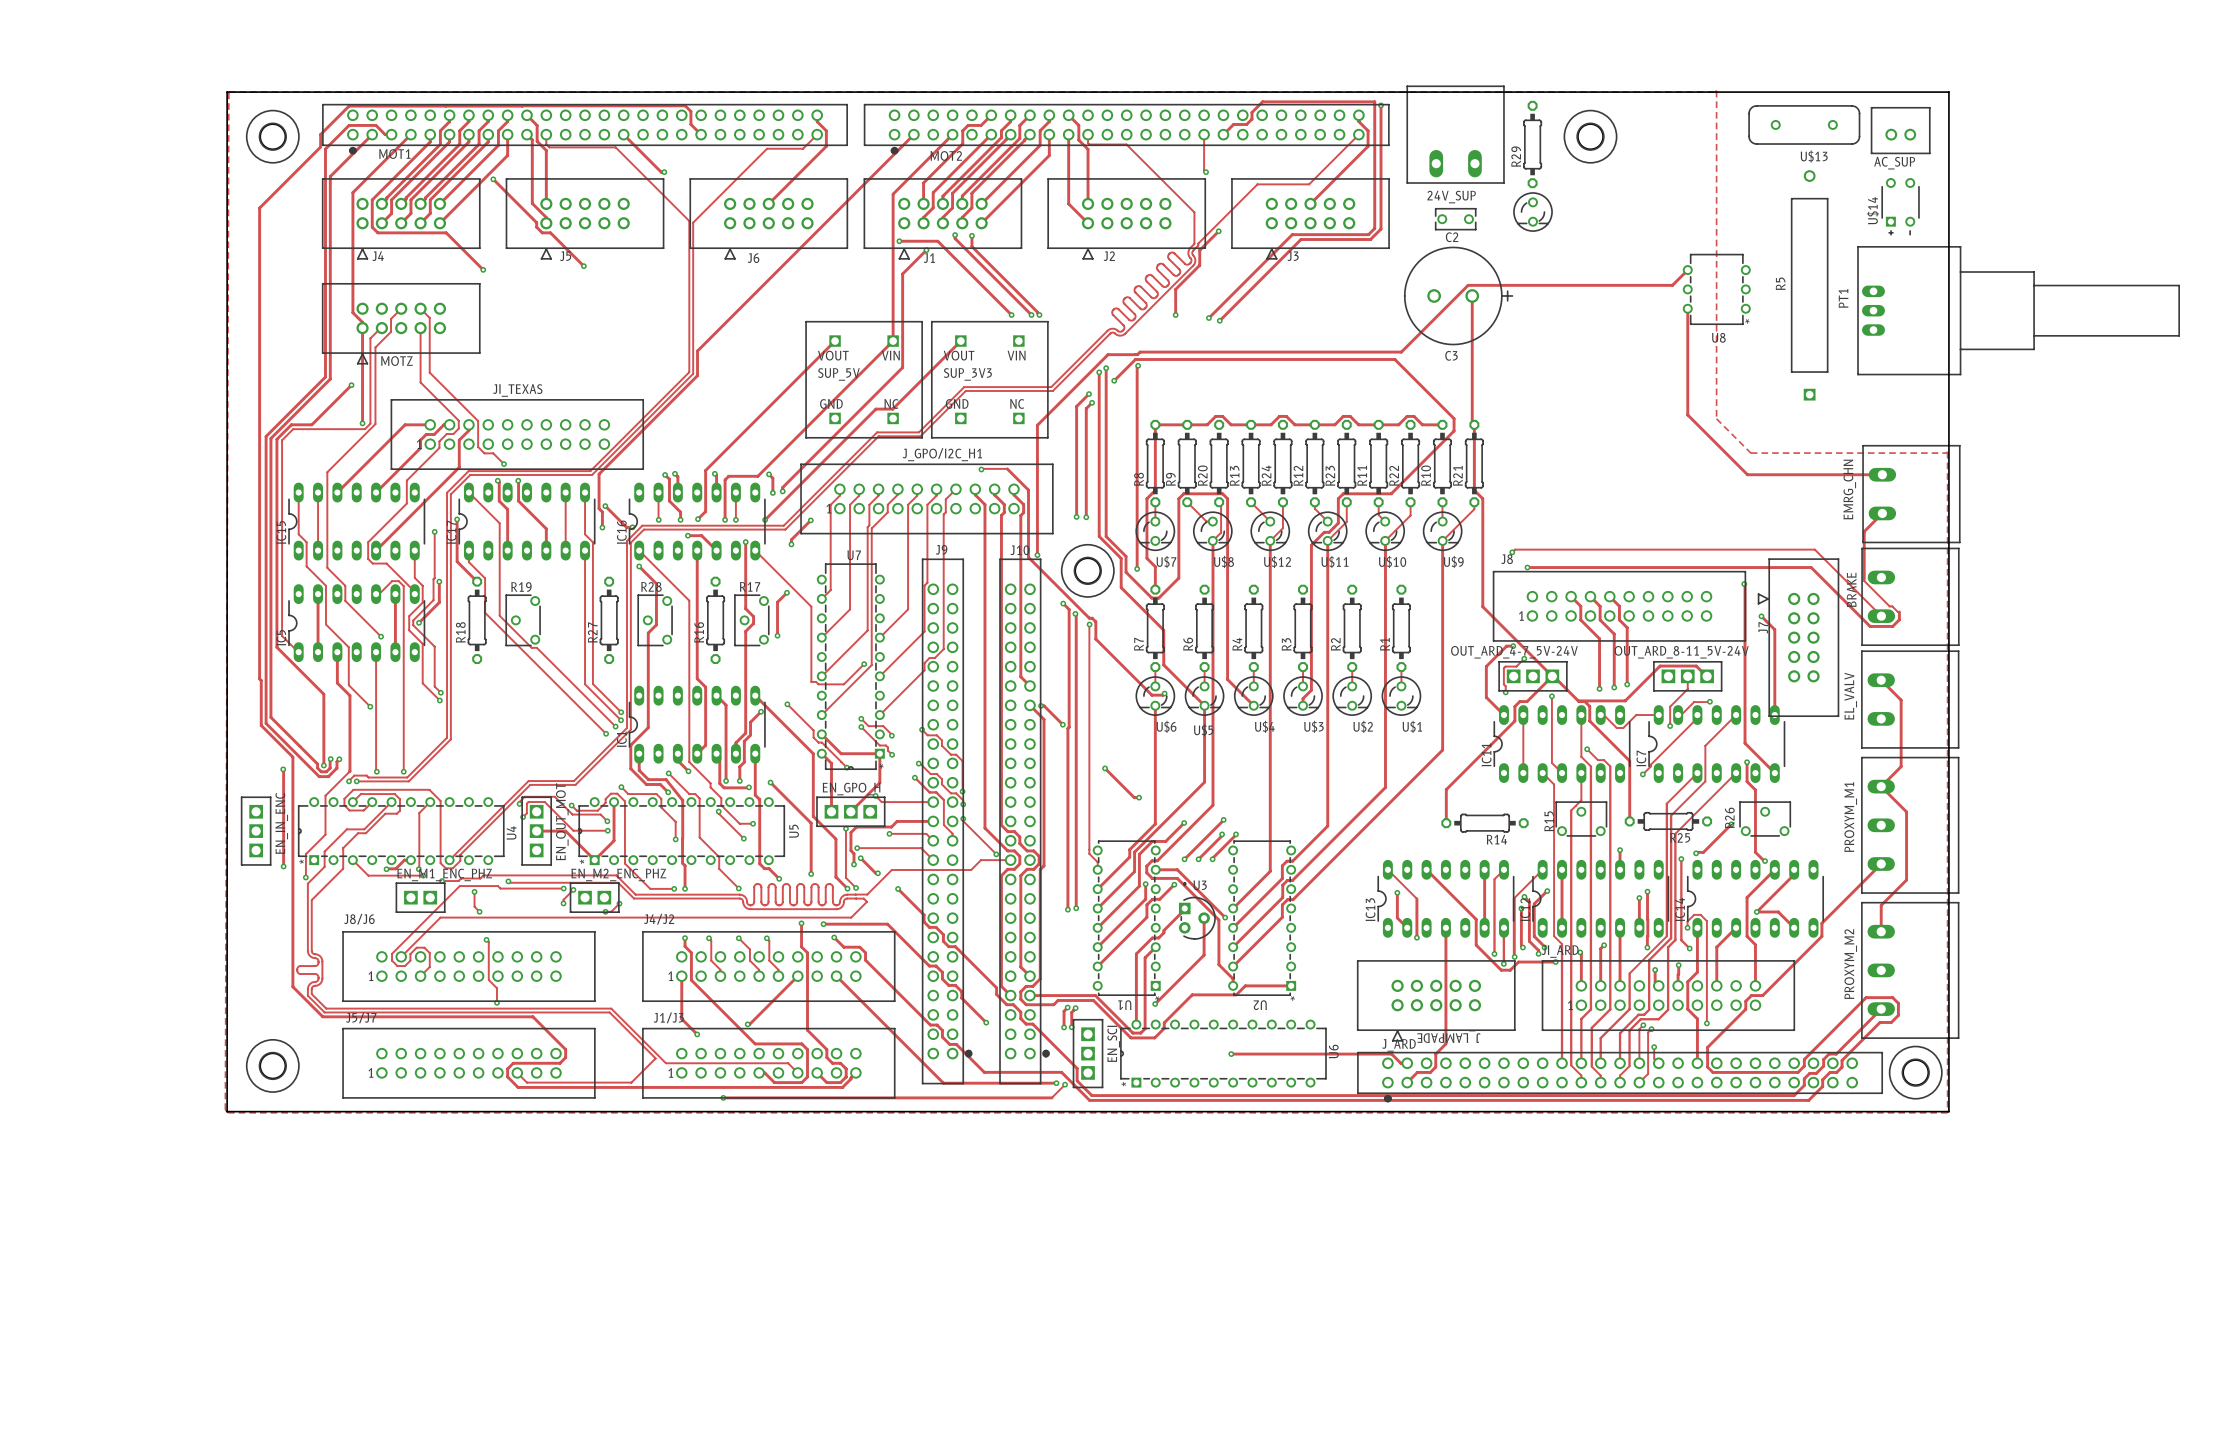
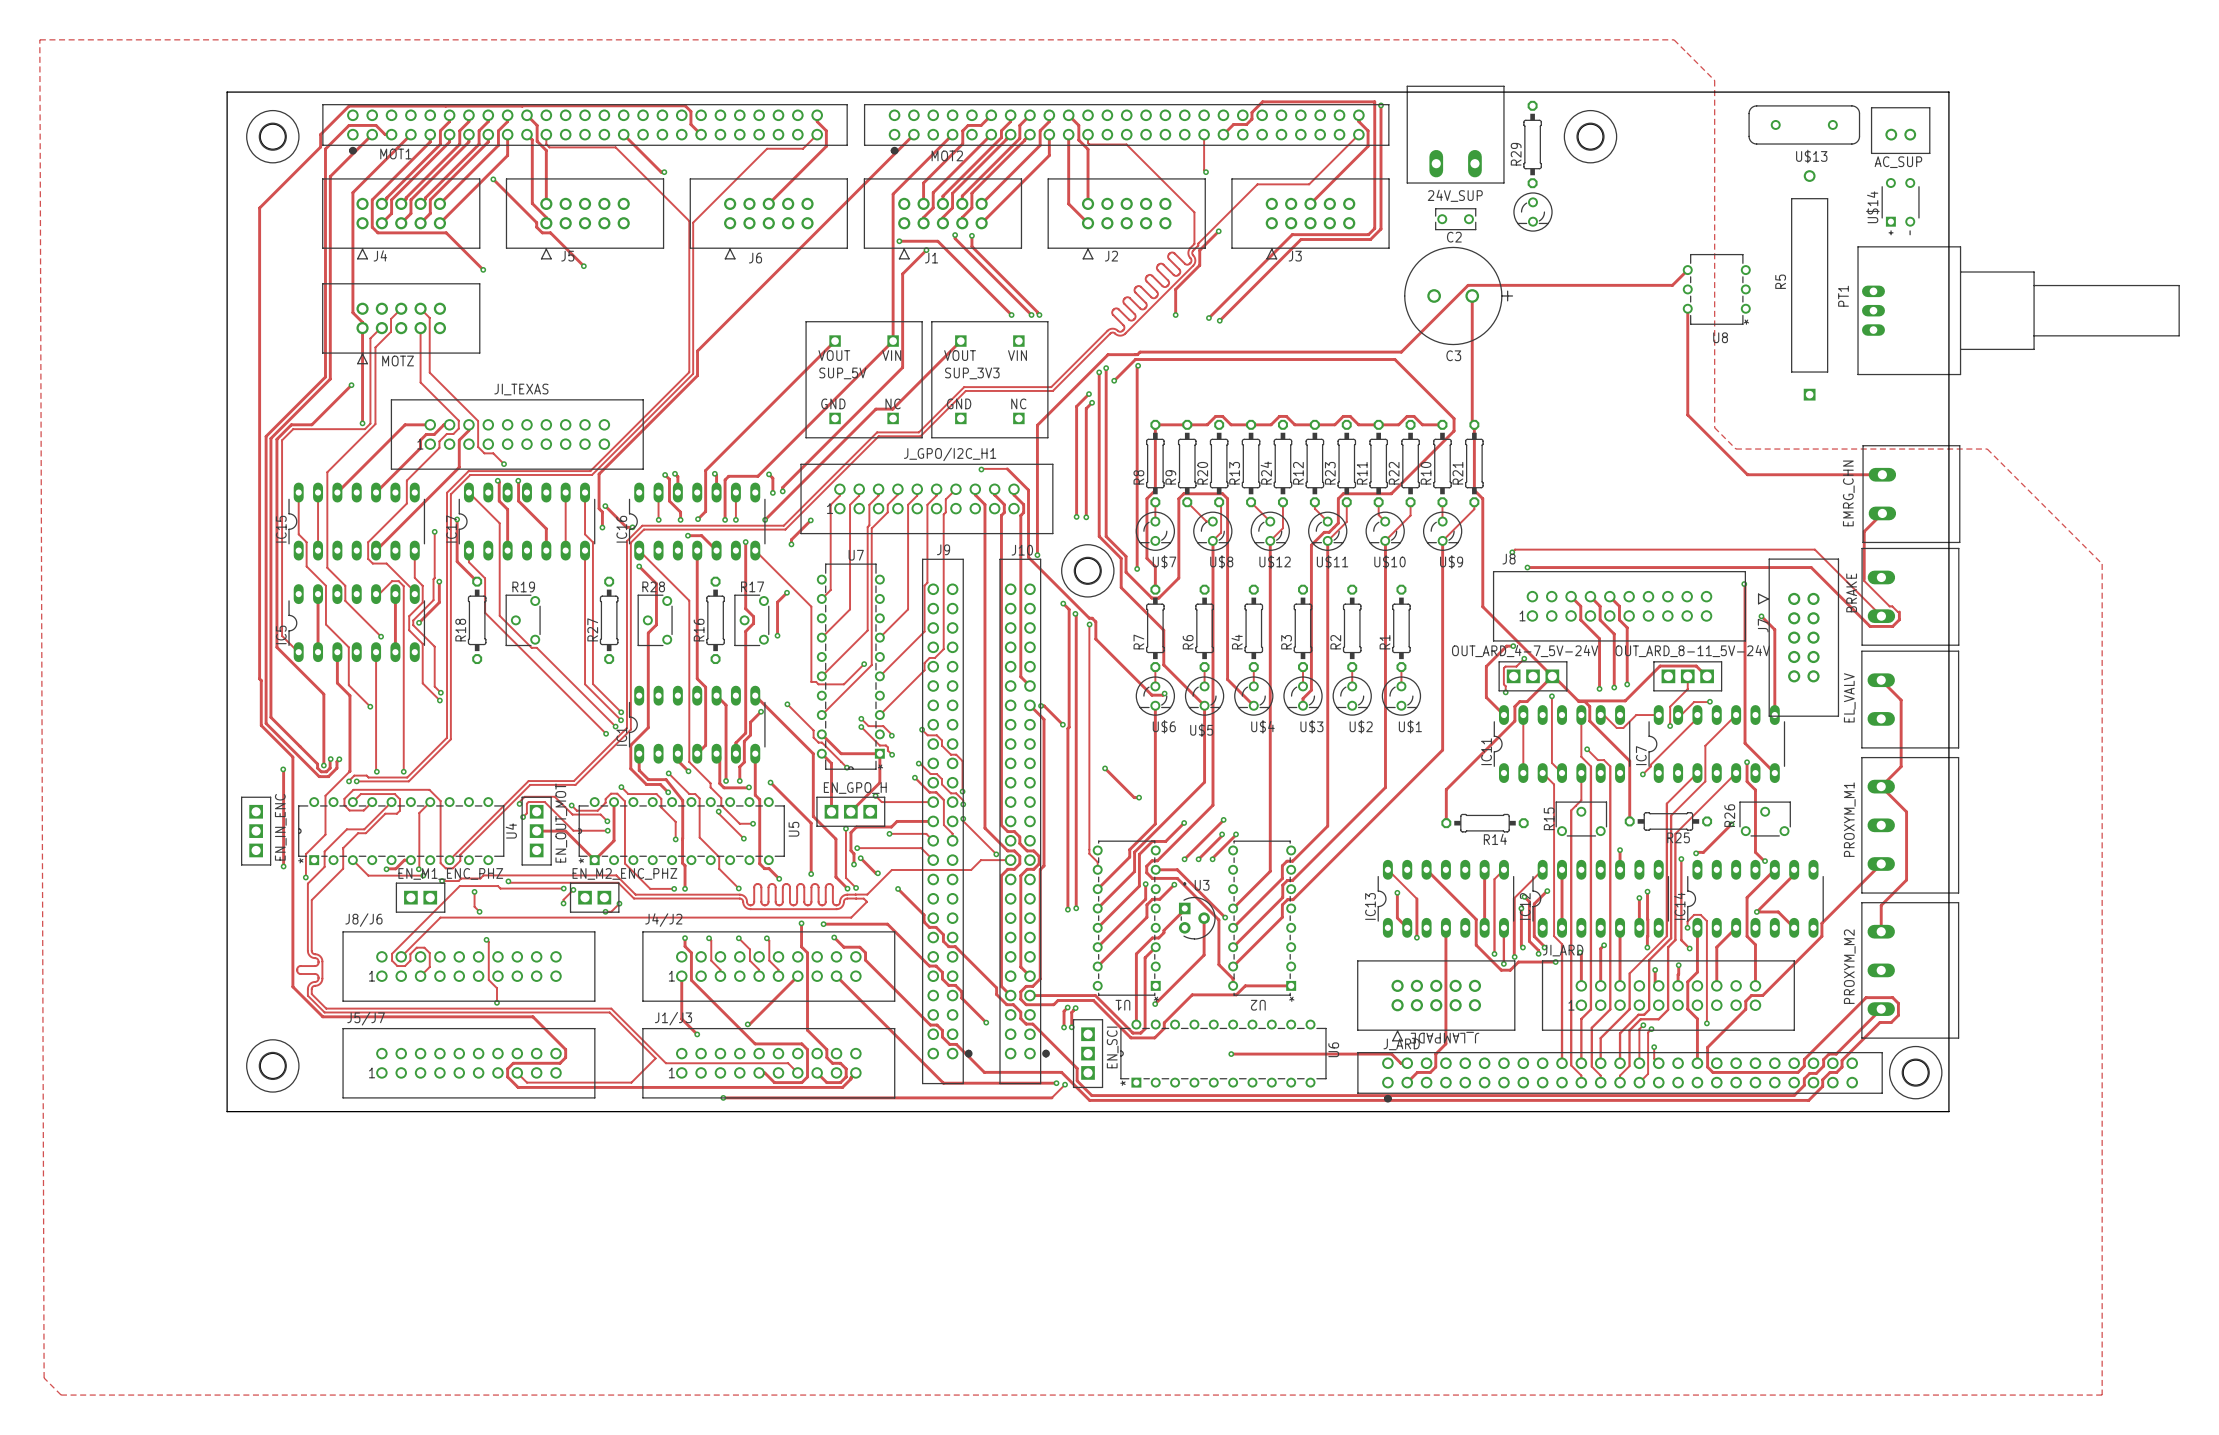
zone outline: (1716, 90) (228, 91) (225, 1109) (228, 1112) (1947, 1112) (1947, 451) (1750, 453) (1716, 418) (1716, 90) -> (39, 39) (44, 1378) (61, 1395) (2102, 1395) (2102, 563) (1987, 449) (1735, 449) (1714, 427) (1714, 80) (1674, 39) (39, 39)

